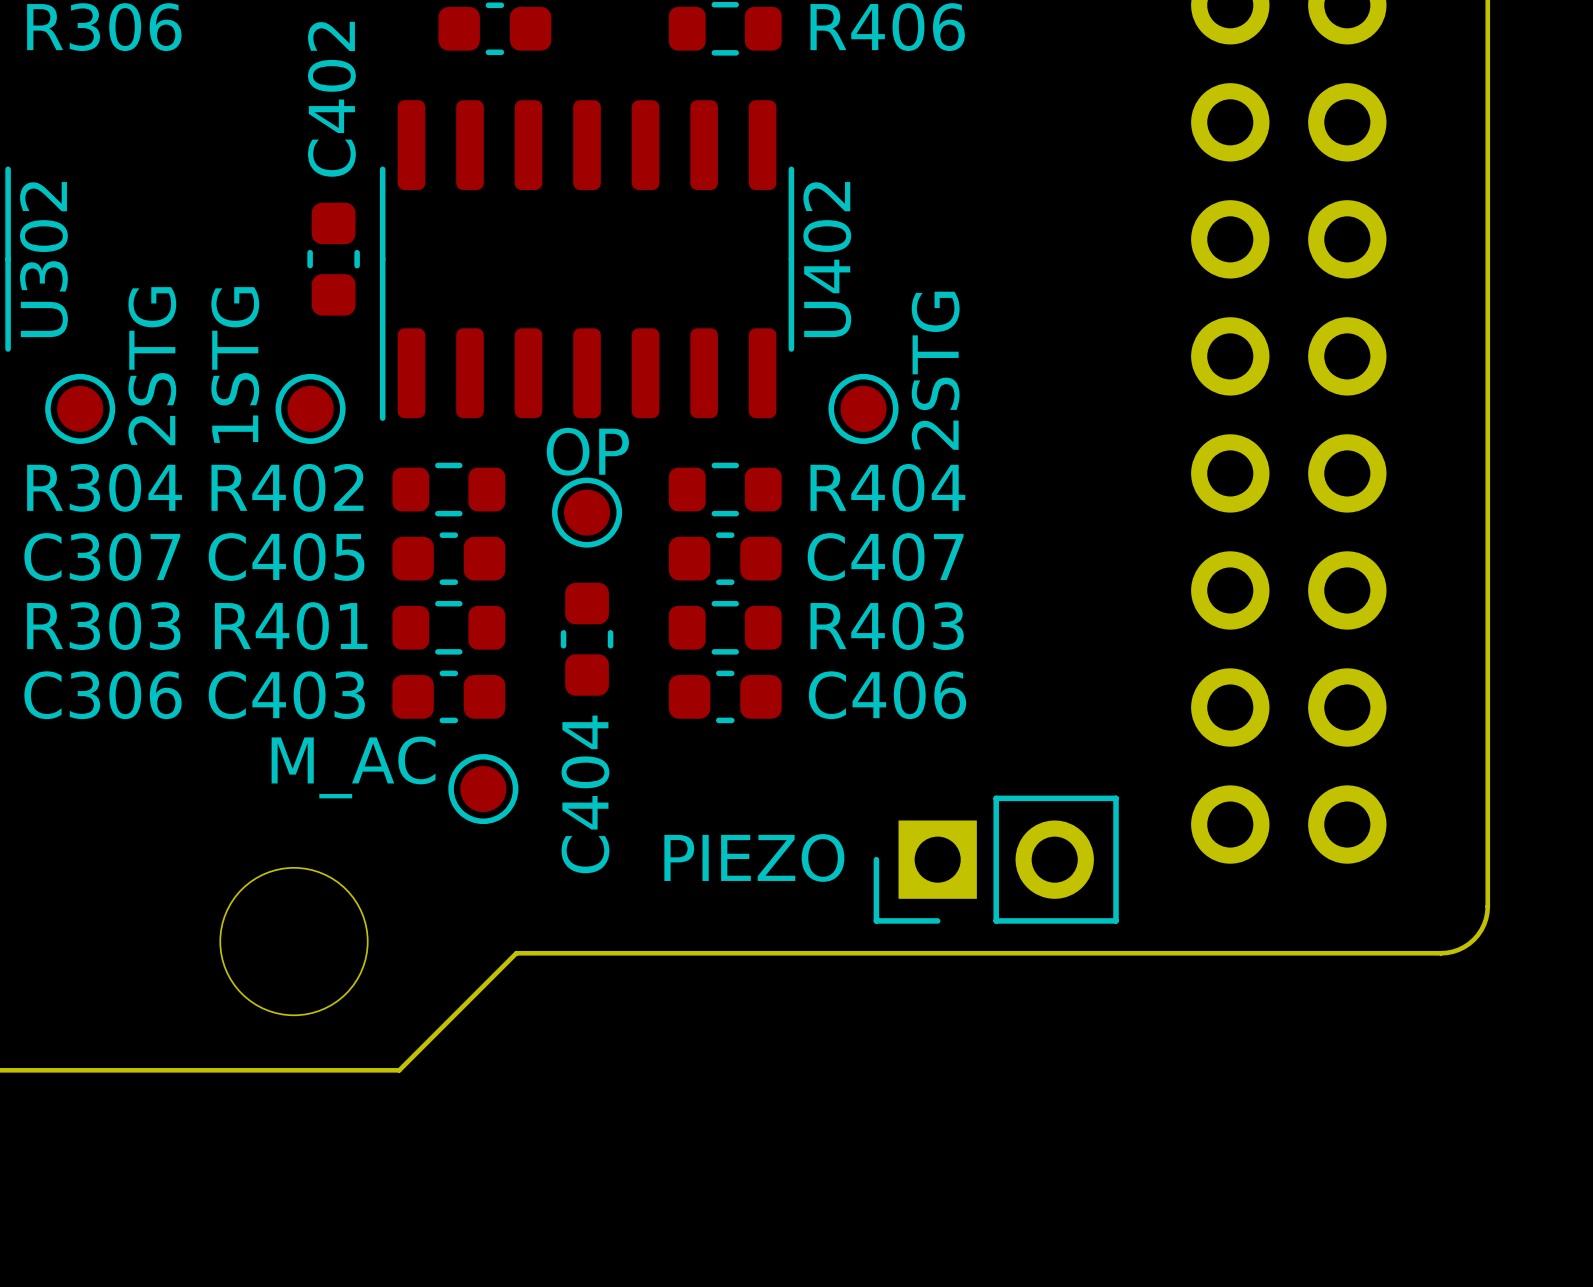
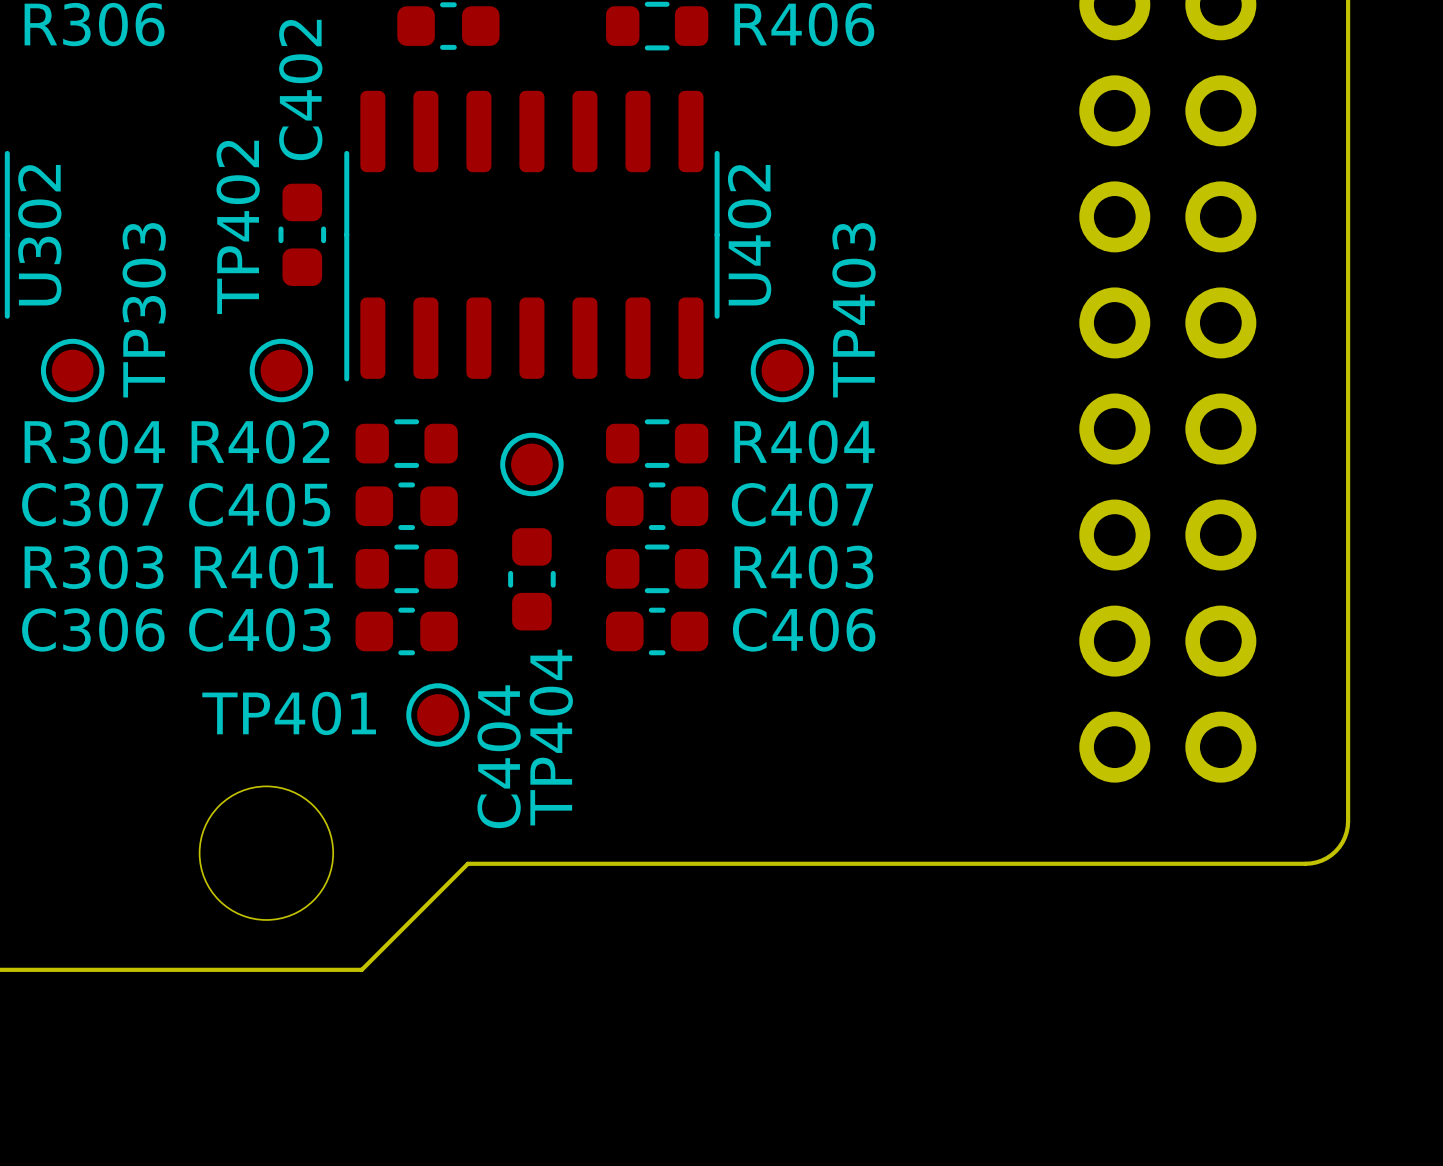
TP402 name: none -> TP402 (238, 227)
TP303 name: none -> TP303 (144, 310)
TP403 name: none -> TP403 (853, 310)
TP402 value: 1STG (235, 365) -> none
TP303 value: 2STG (152, 366) -> none
TP403 value: 2STG (935, 370) -> none
TP404 value: OP (587, 451) -> none
TP401 value: M_AC (353, 767) -> none
TP401 name: none -> TP401 (289, 713)
C404 name position: C404 (585, 794) -> C404 (499, 756)
TP404 name: none -> TP404 (551, 737)
part: PIEZO (996, 859) -> none

